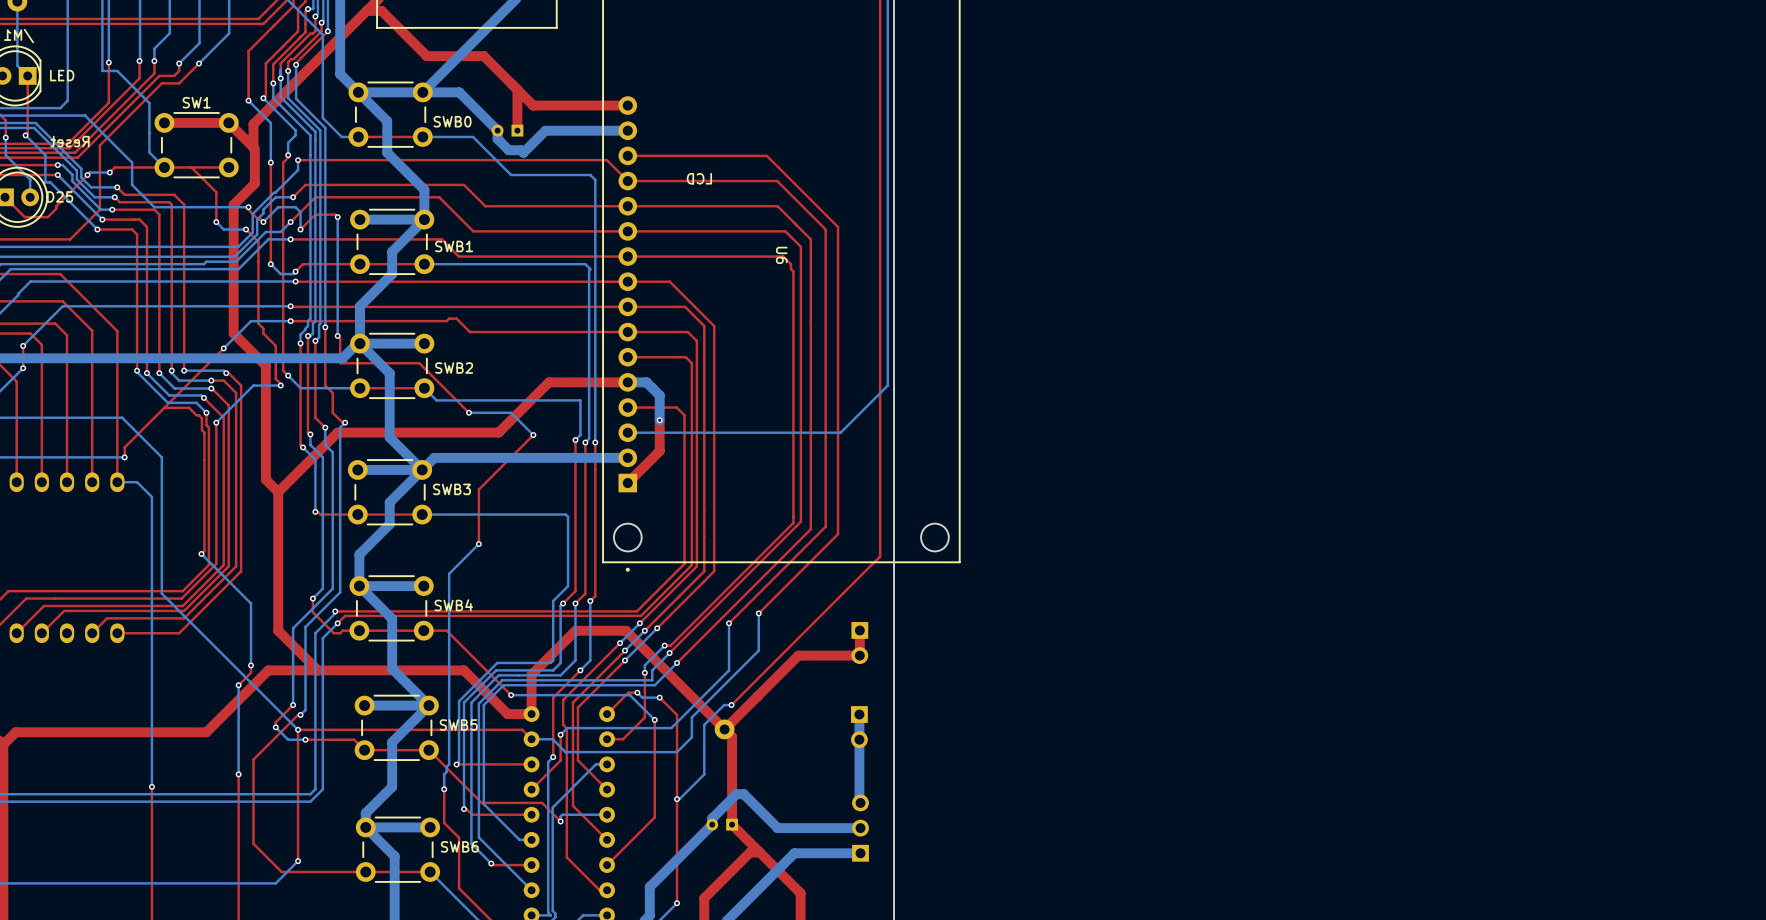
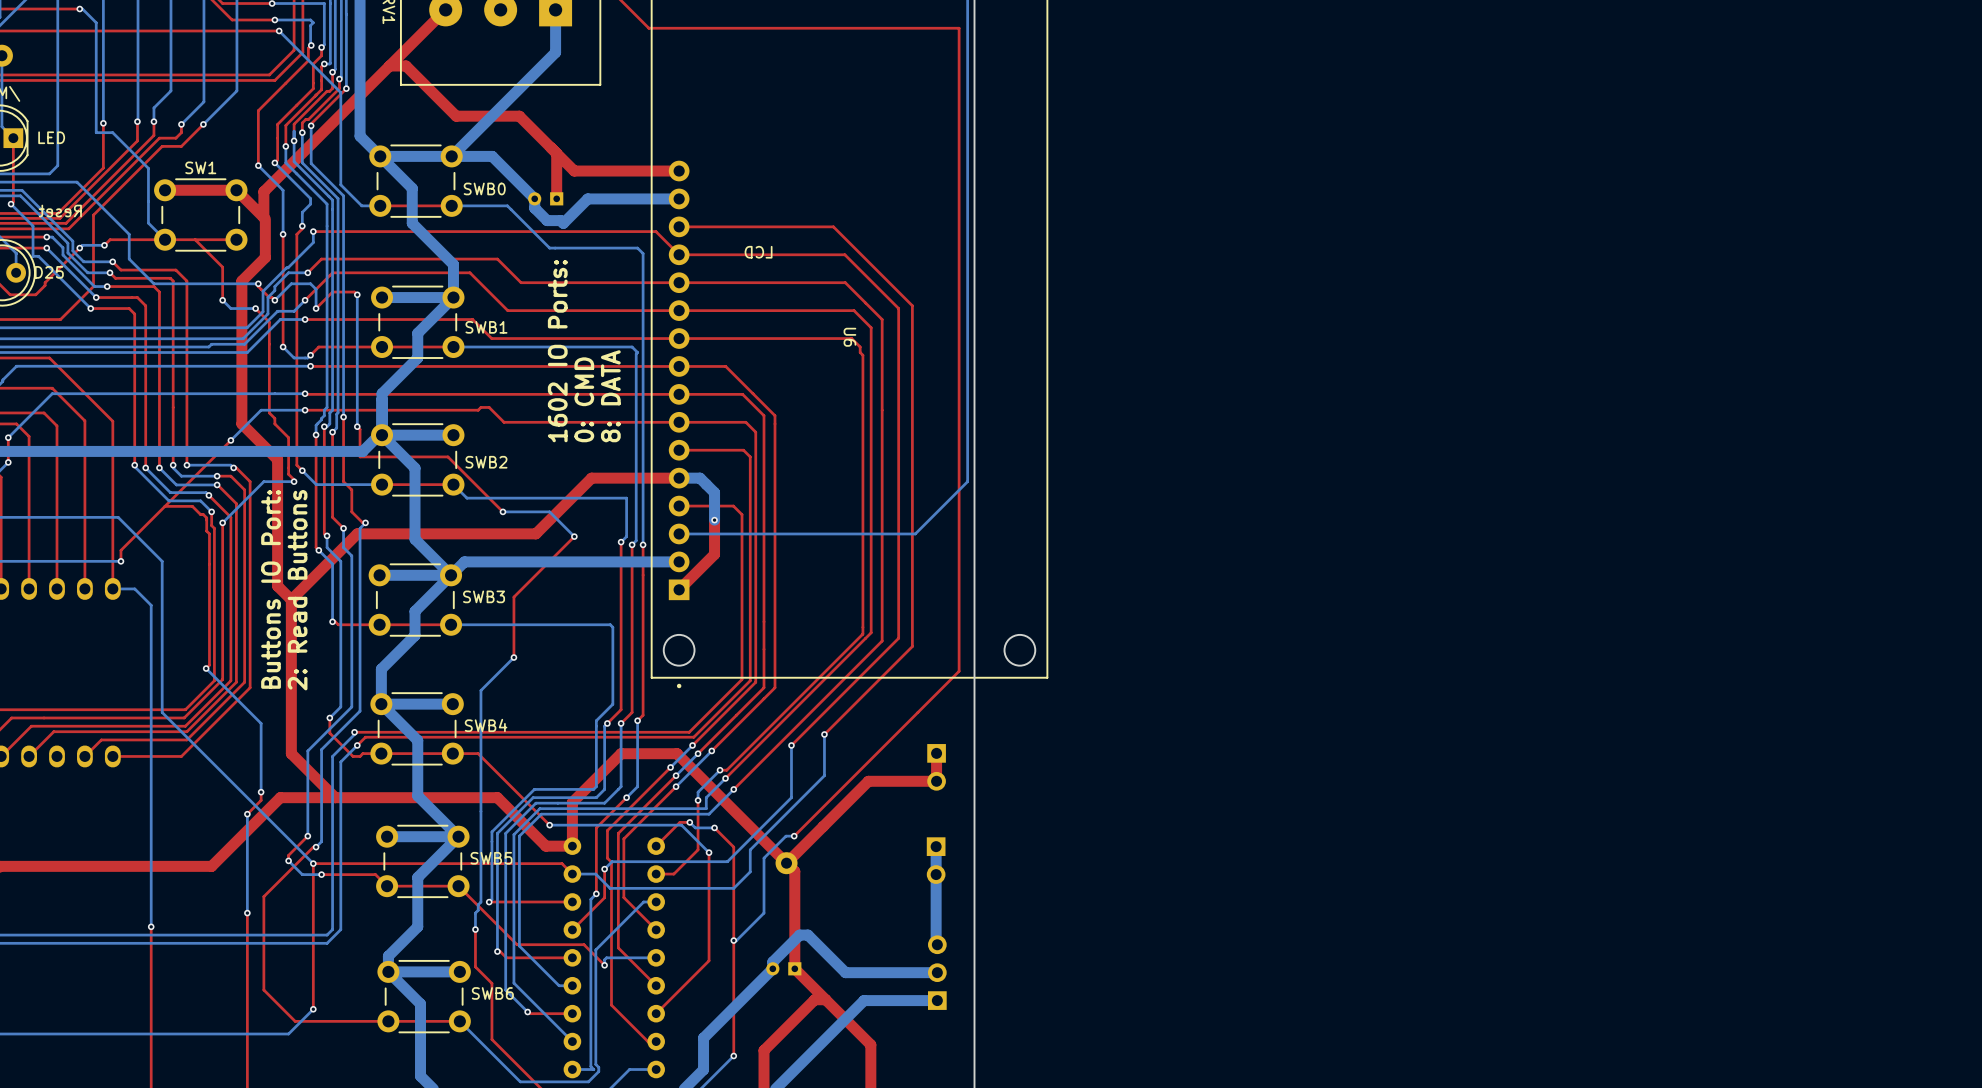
text: none -> 1602 IO Ports: (557, 351)
text: none -> 8: DATA (610, 396)
text: none -> 0: CMD (584, 399)
text: none -> Buttons IO Port: (271, 589)
text: none -> 2: Read Buttons (297, 590)

